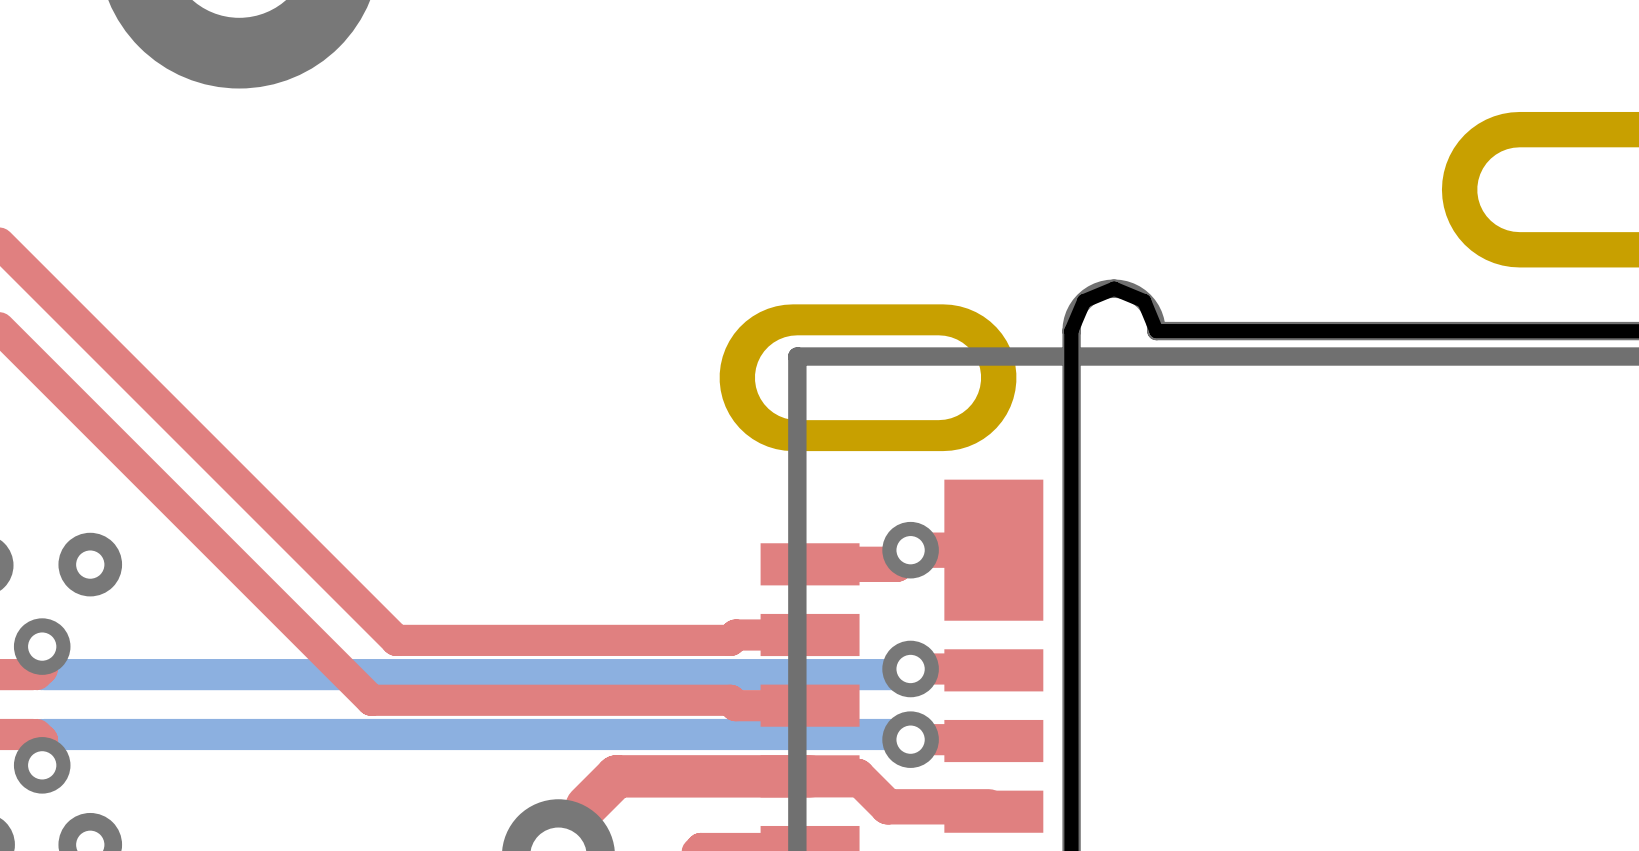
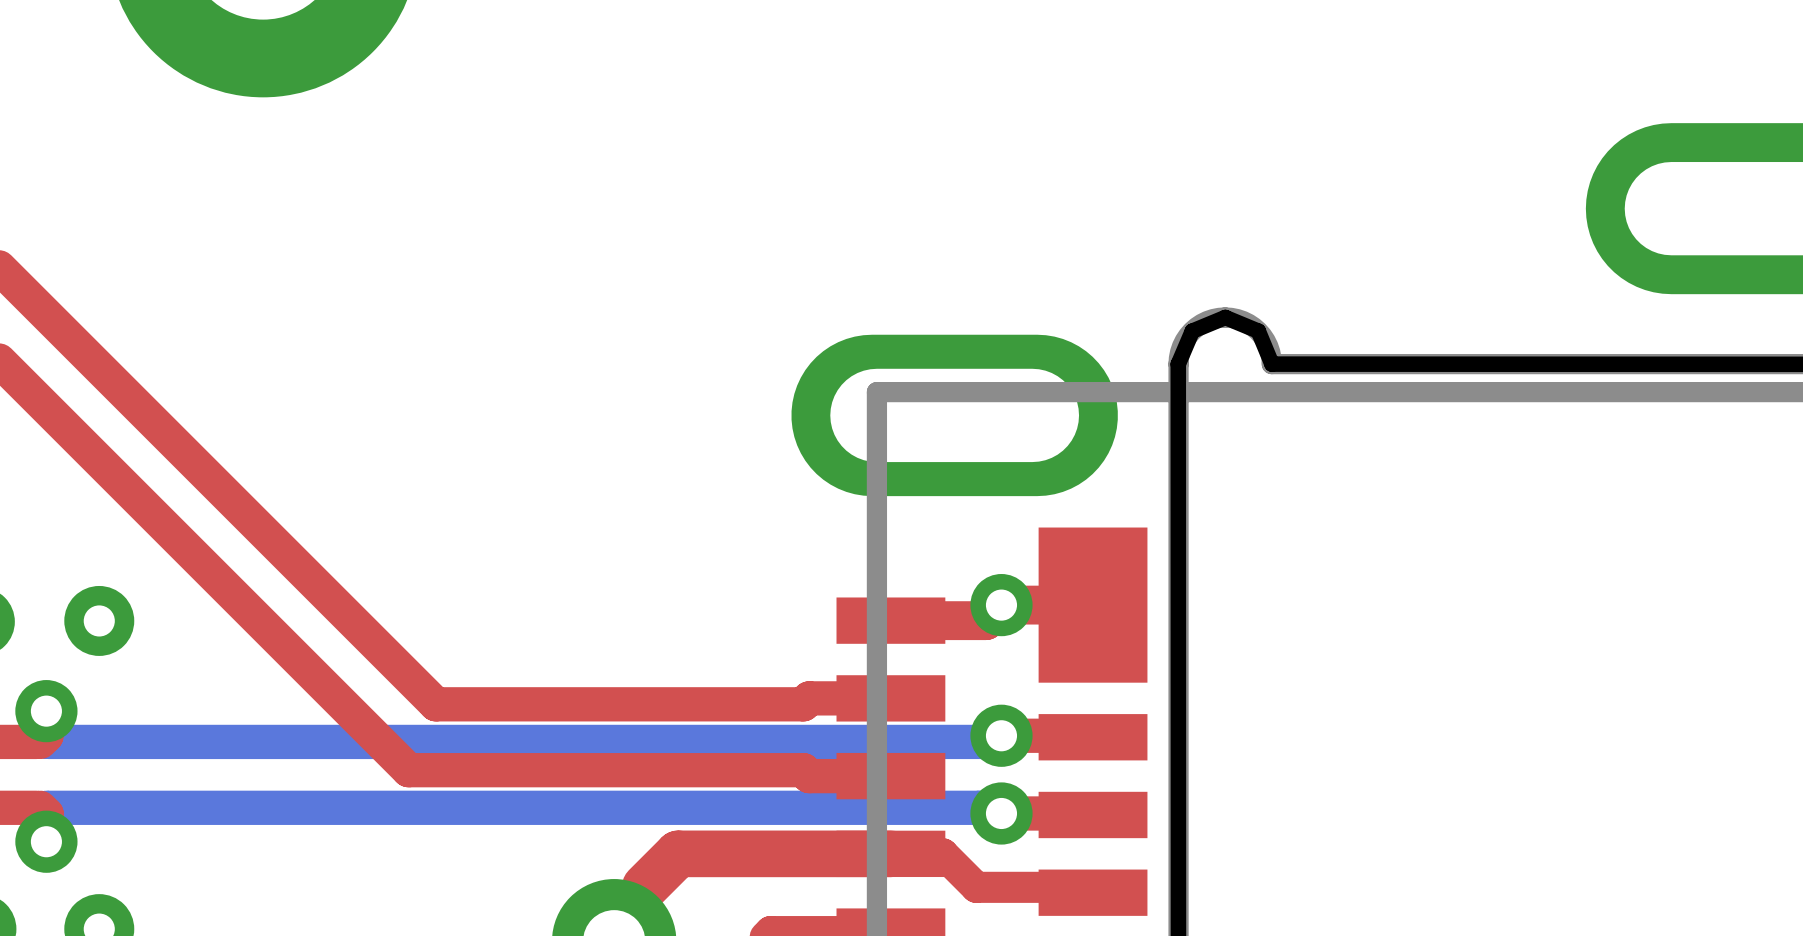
top track width: thick (810, 776) (857, 776) (887, 806) (988, 806) -> thin (890, 853) (942, 853) (976, 887) (1087, 887)

